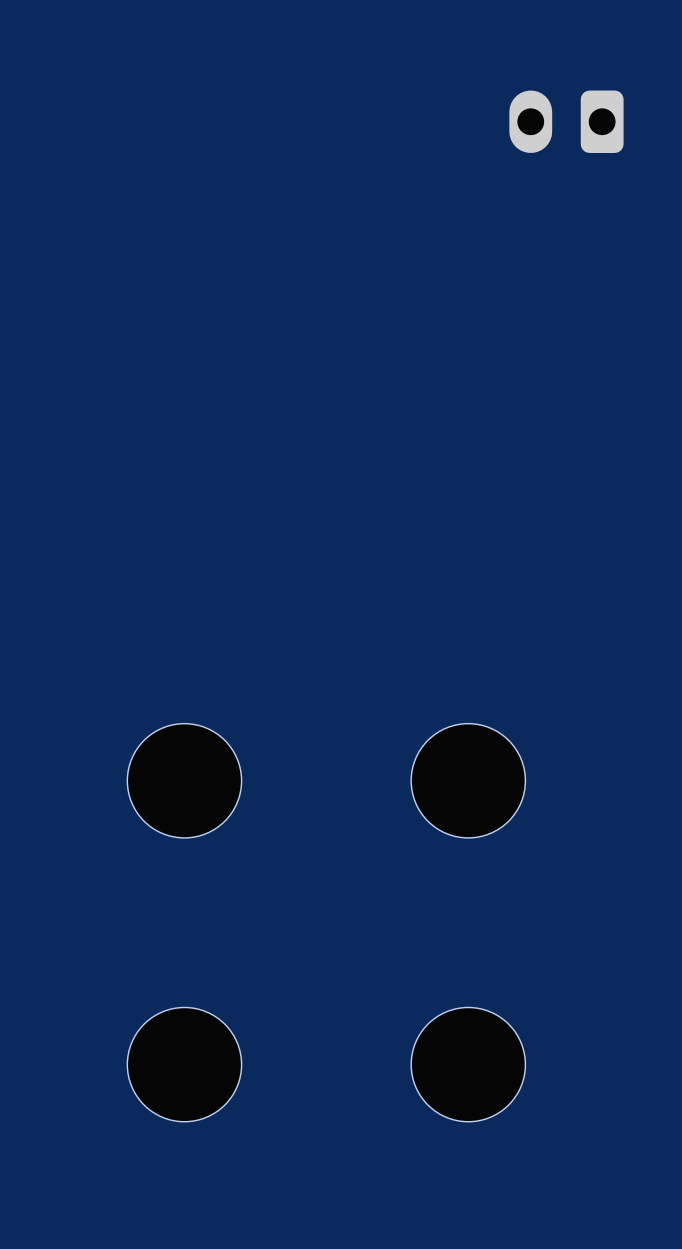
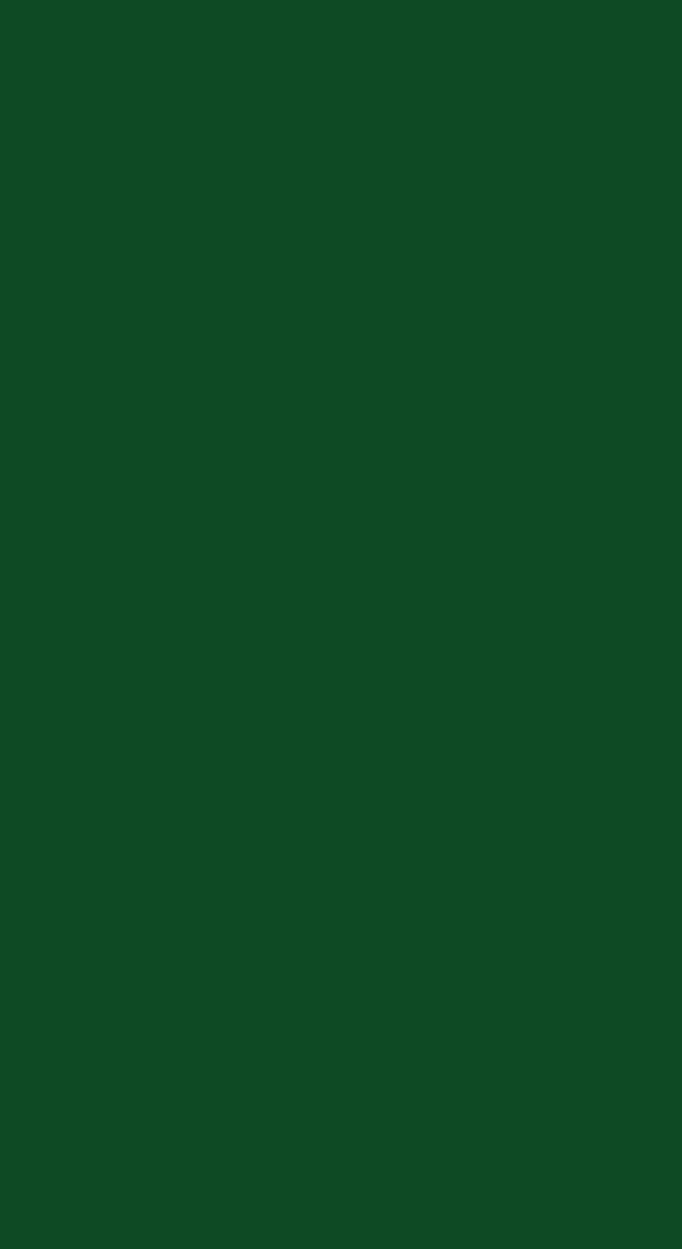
part: (566, 121) -> none
part: (184, 780) -> none
part: (468, 780) -> none
part: (184, 1064) -> none
part: (468, 1064) -> none

